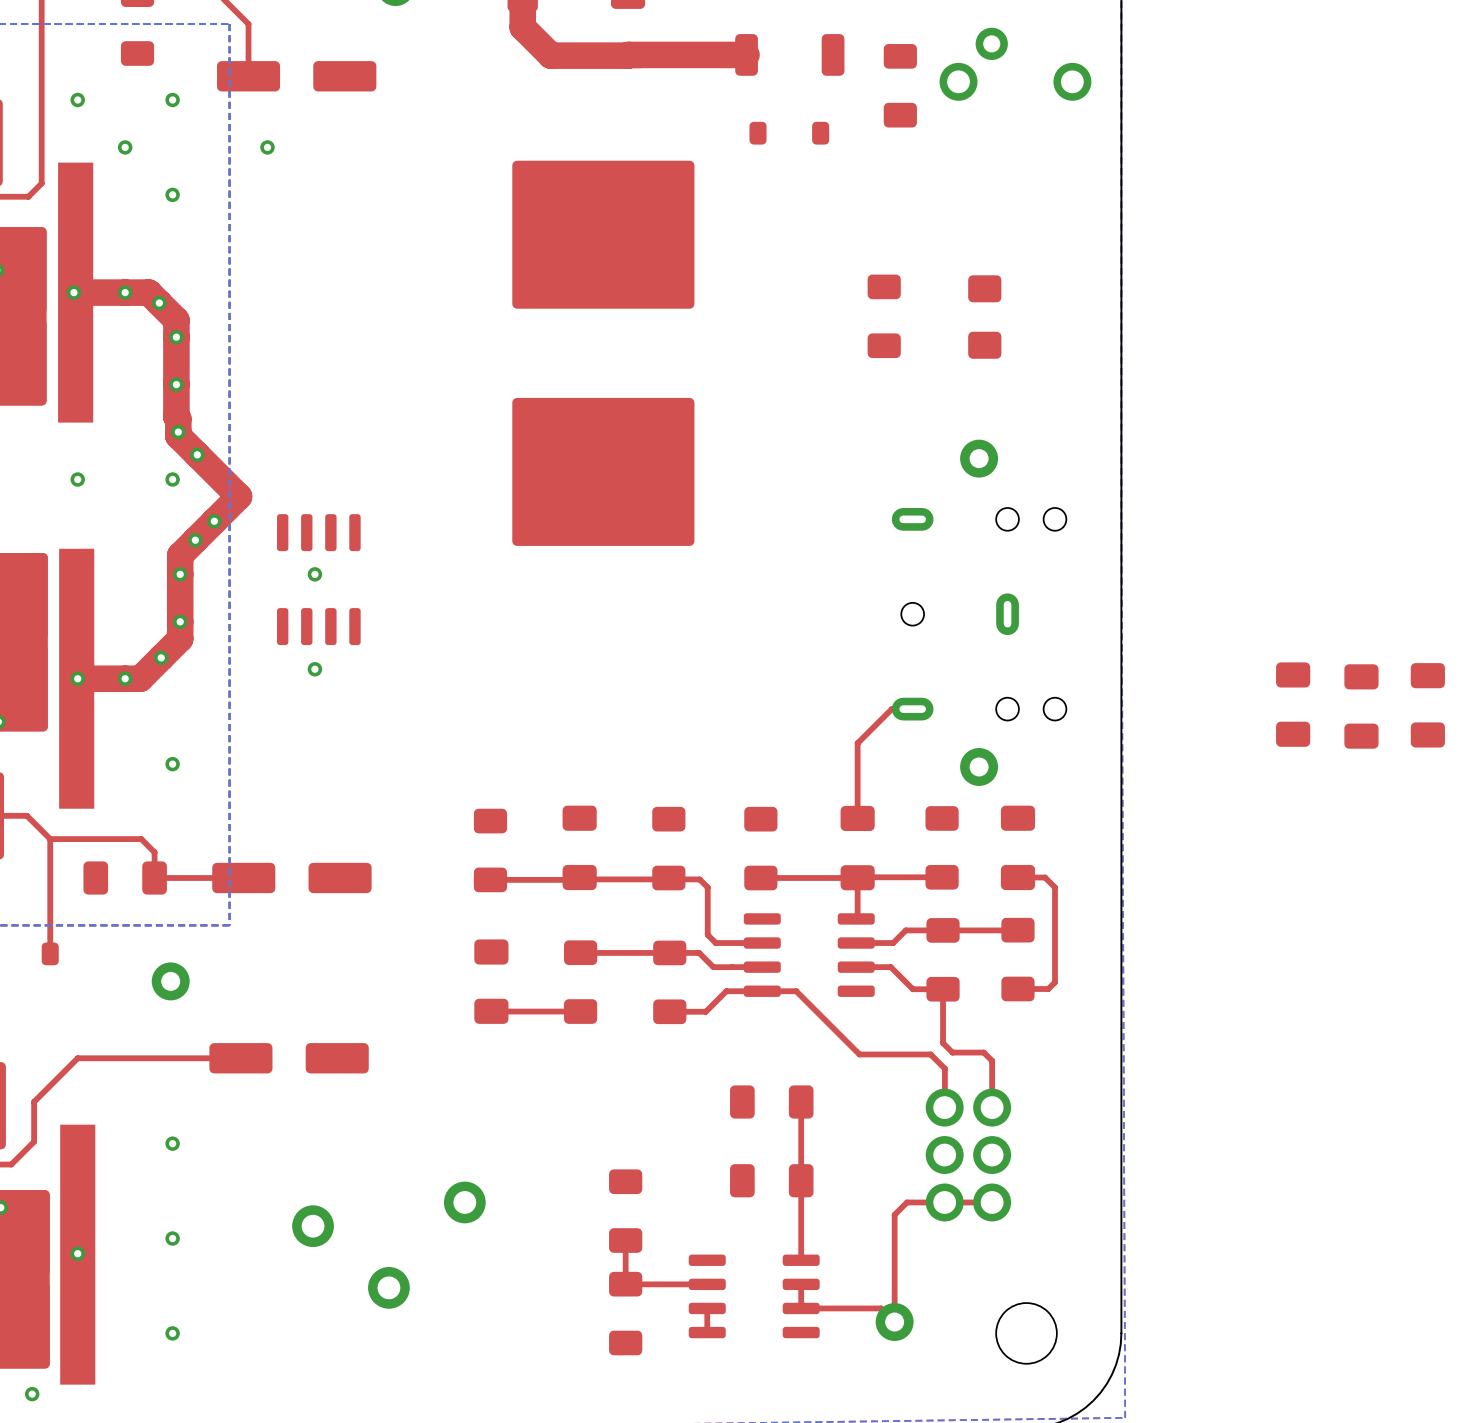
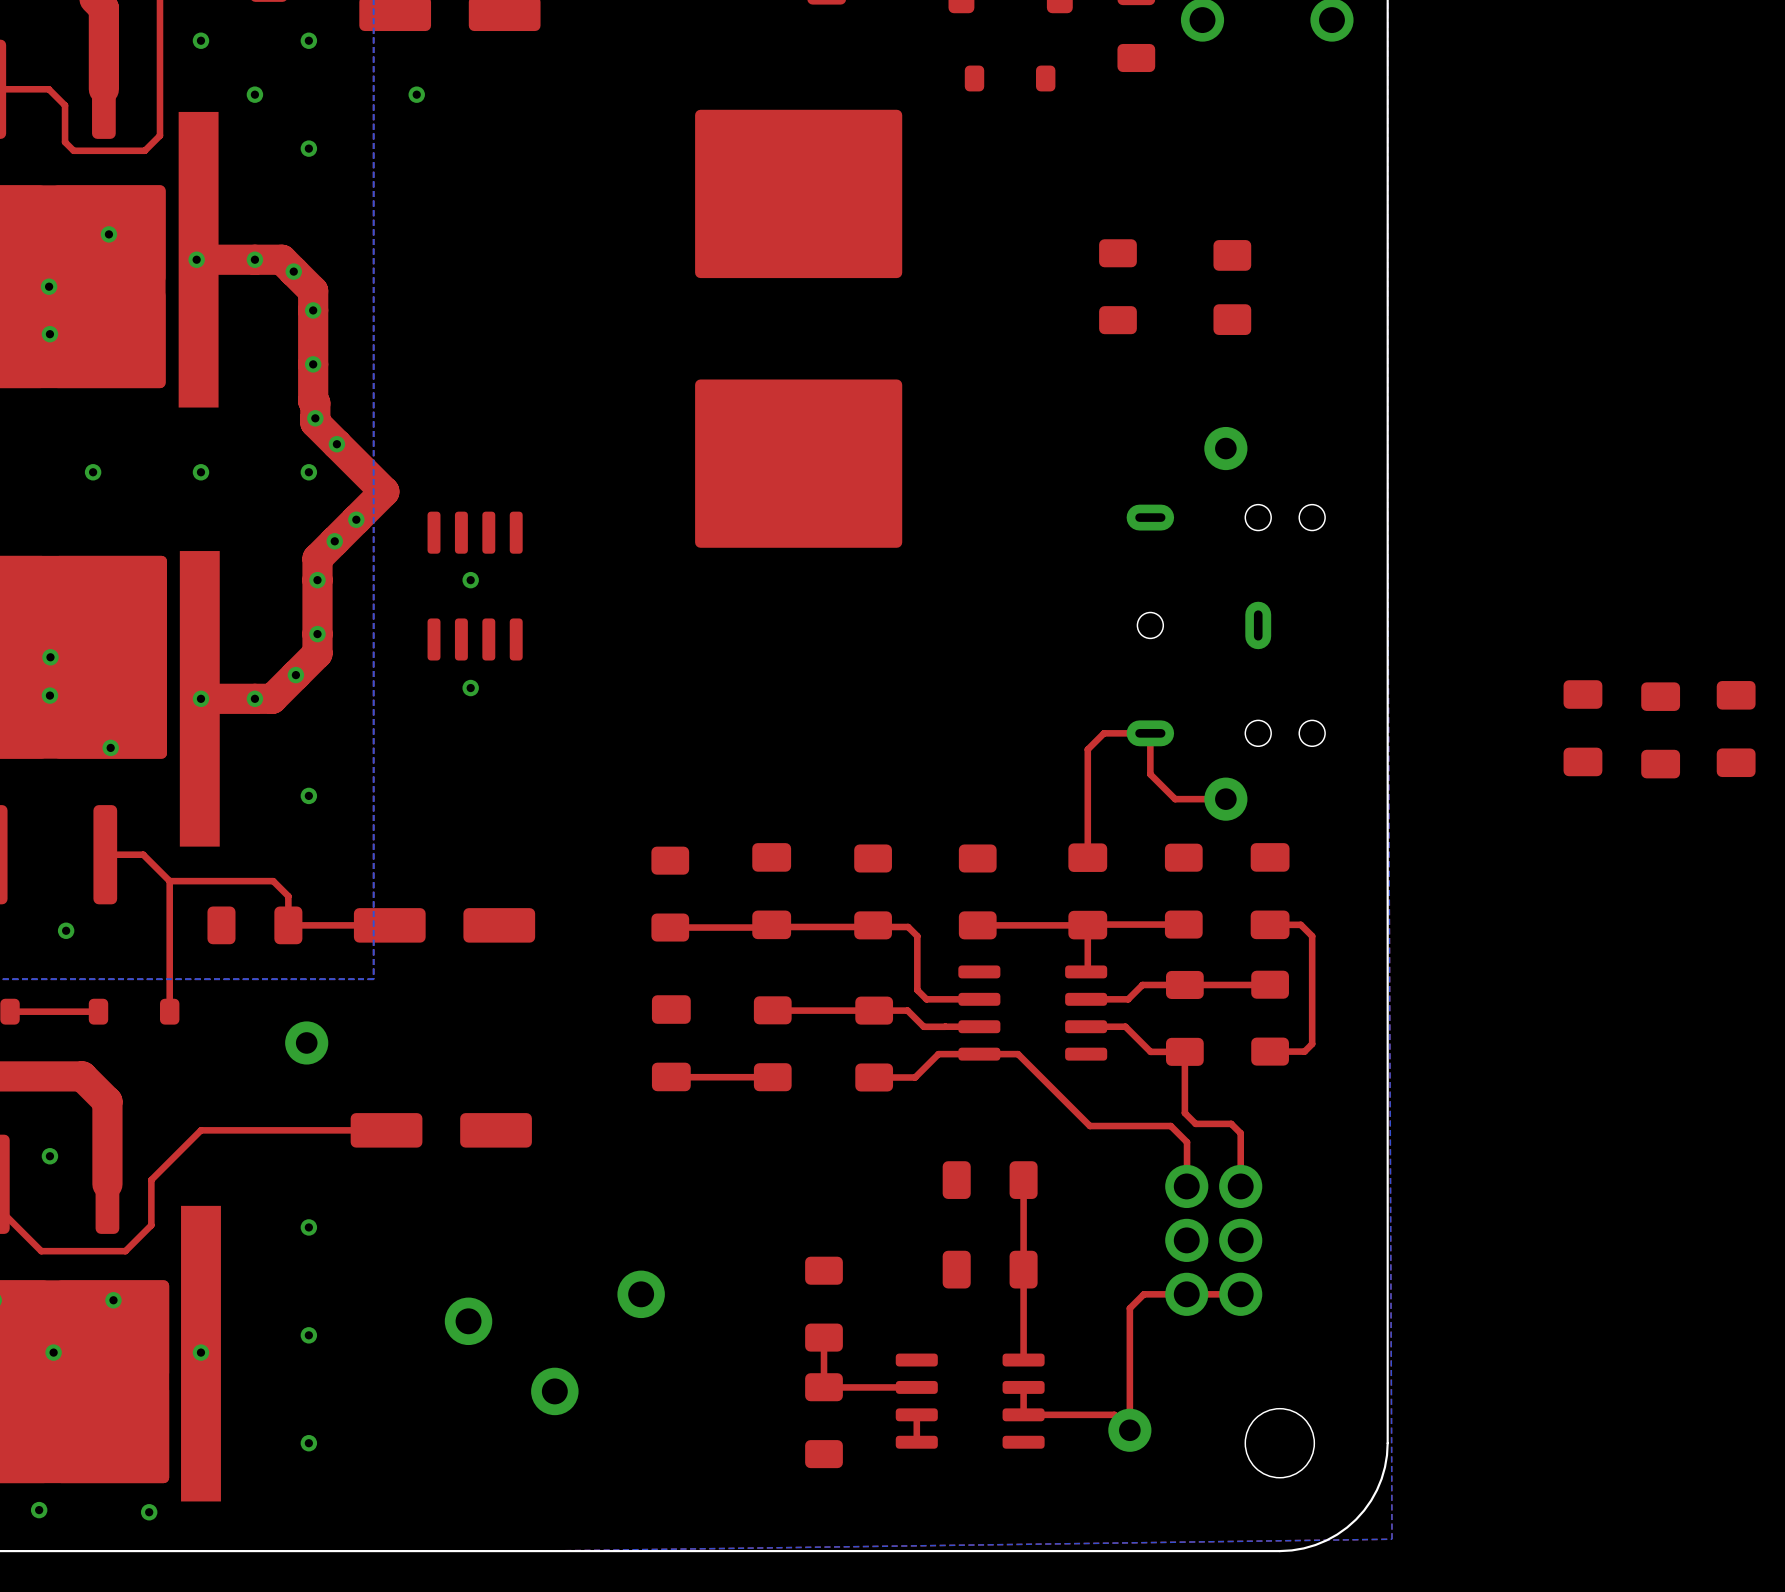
top track: (891, 709) (857, 743) -> (1126, 733) (1103, 733) (1087, 749) (1087, 772)
top track: none -> (1150, 733) (1150, 774) (1175, 799) (1225, 799)

